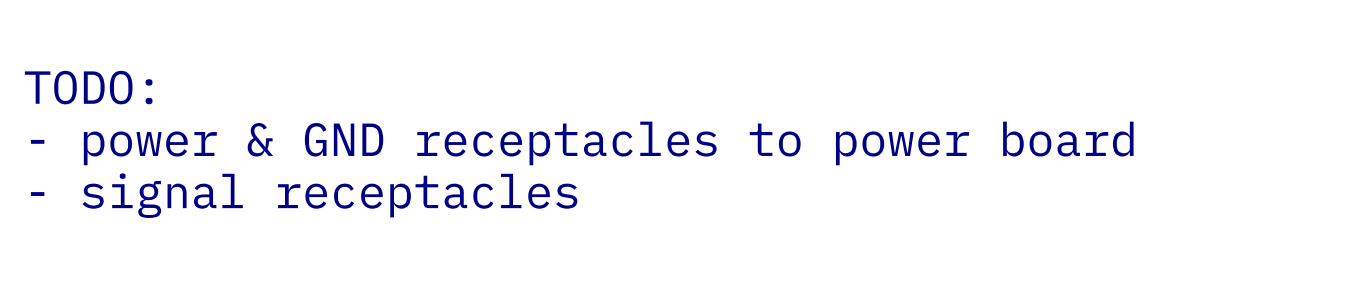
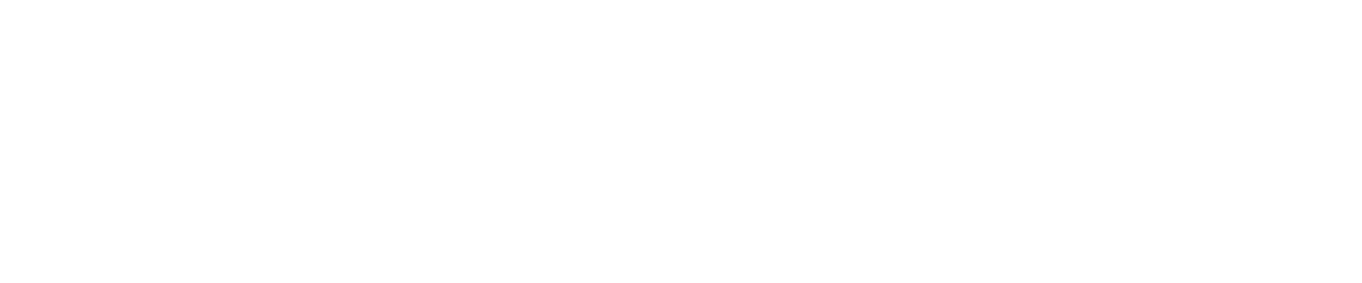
text: TODO: (88, 87) -> none
text: - power & GND receptacles to power board (582, 143) -> none
text: - signal receptacles (304, 195) -> none

